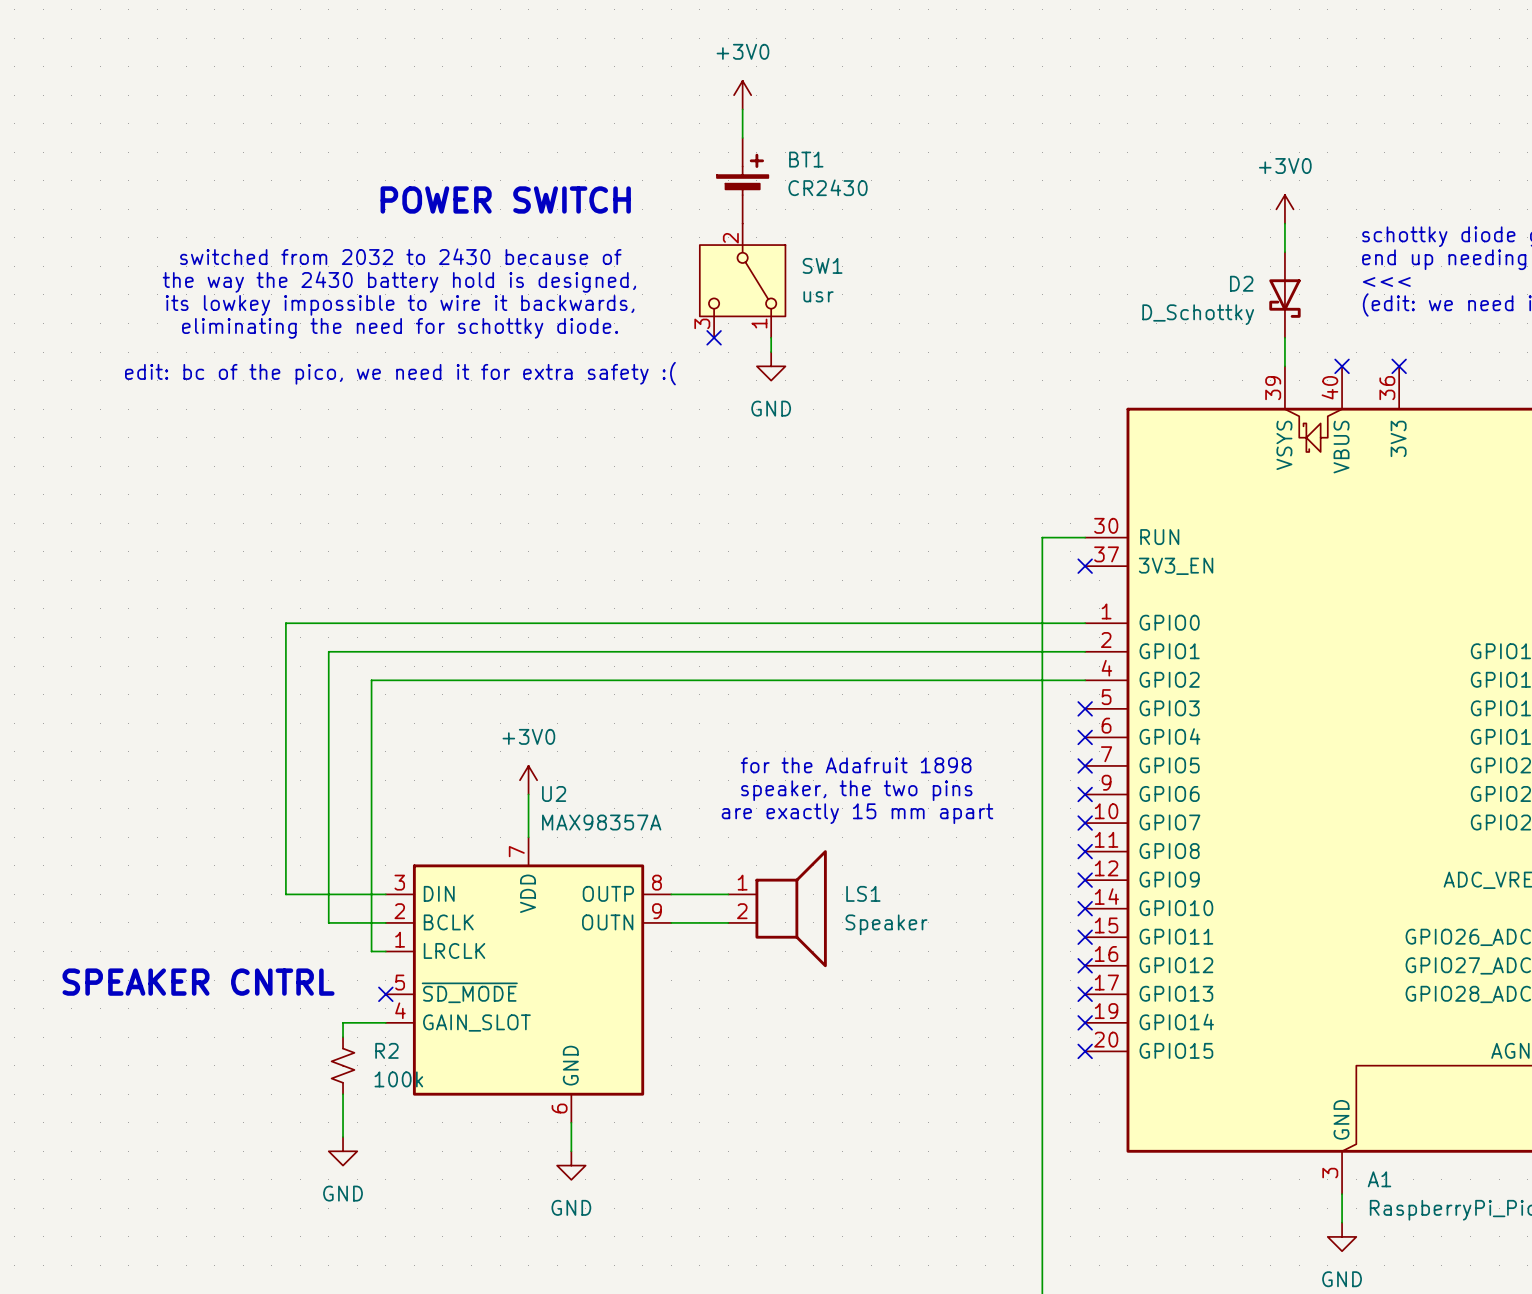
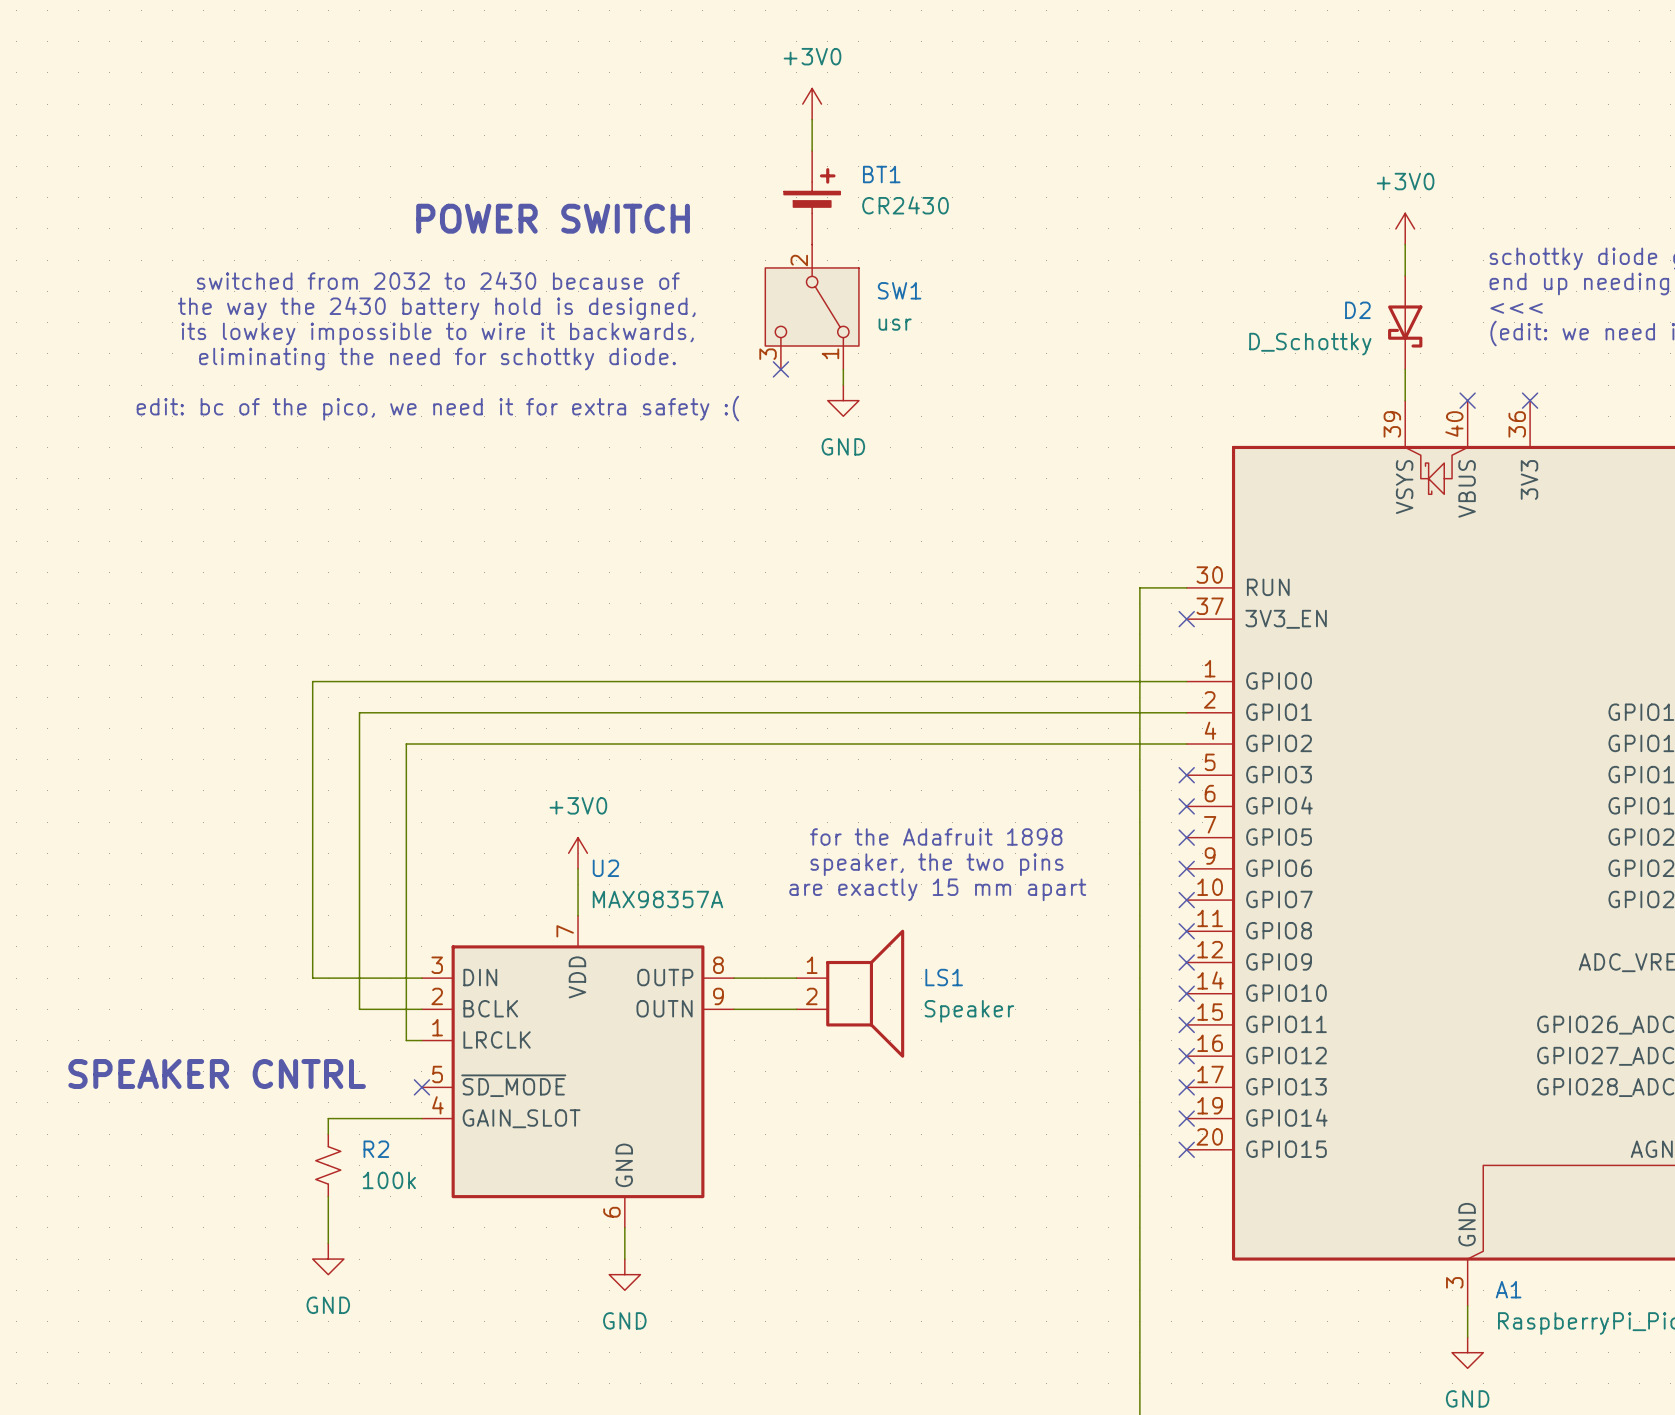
wire: (343, 1022) (343, 1037) -> (375, 1118) (328, 1118) (328, 1134)
R2 position: (343, 1065) -> (328, 1165)
wire: (343, 1094) (343, 1137) -> (328, 1196) (328, 1243)
power symbol position: GND (343, 1151) -> GND (328, 1259)

